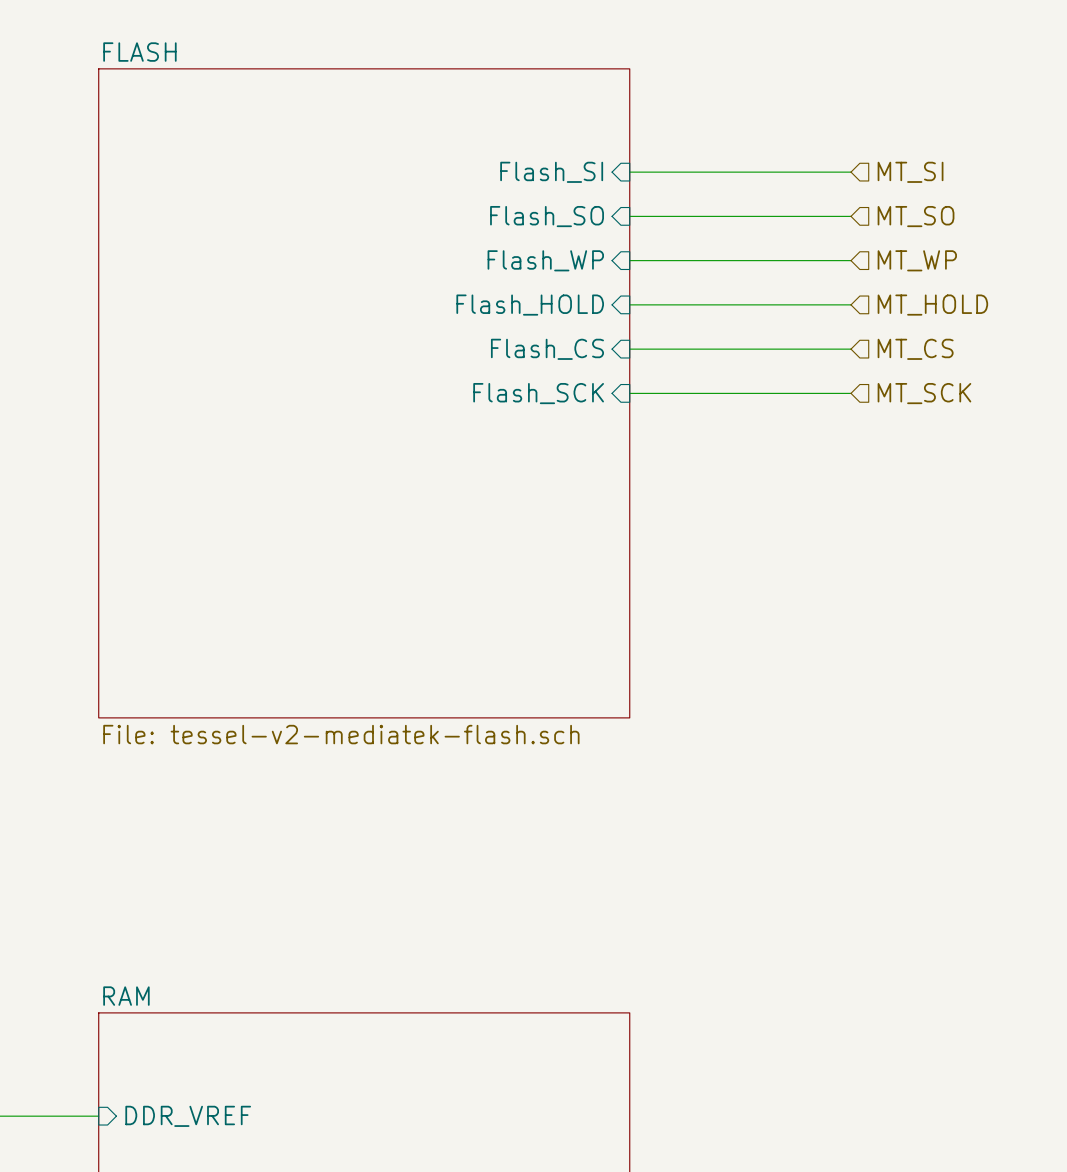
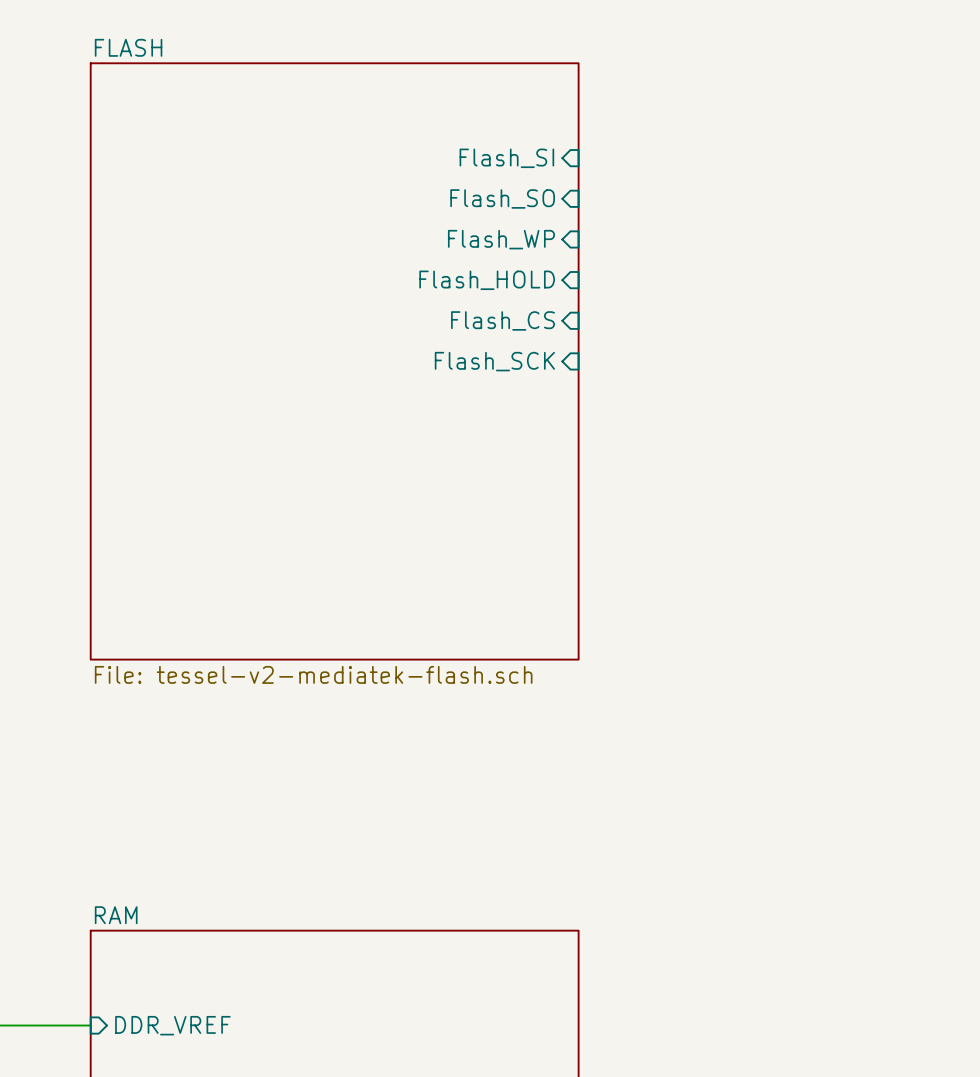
wire: (629, 172) (851, 172) -> none
hierarchical label: MT_SI (910, 172) -> none
wire: (629, 216) (851, 216) -> none
hierarchical label: MT_SO (916, 216) -> none
wire: (629, 260) (851, 260) -> none
hierarchical label: MT_WP (917, 260) -> none
wire: (629, 304) (851, 304) -> none
hierarchical label: MT_HOLD (932, 305) -> none
wire: (629, 349) (851, 349) -> none
hierarchical label: MT_CS (915, 349) -> none
wire: (629, 393) (851, 393) -> none
hierarchical label: MT_SCK (924, 393) -> none

